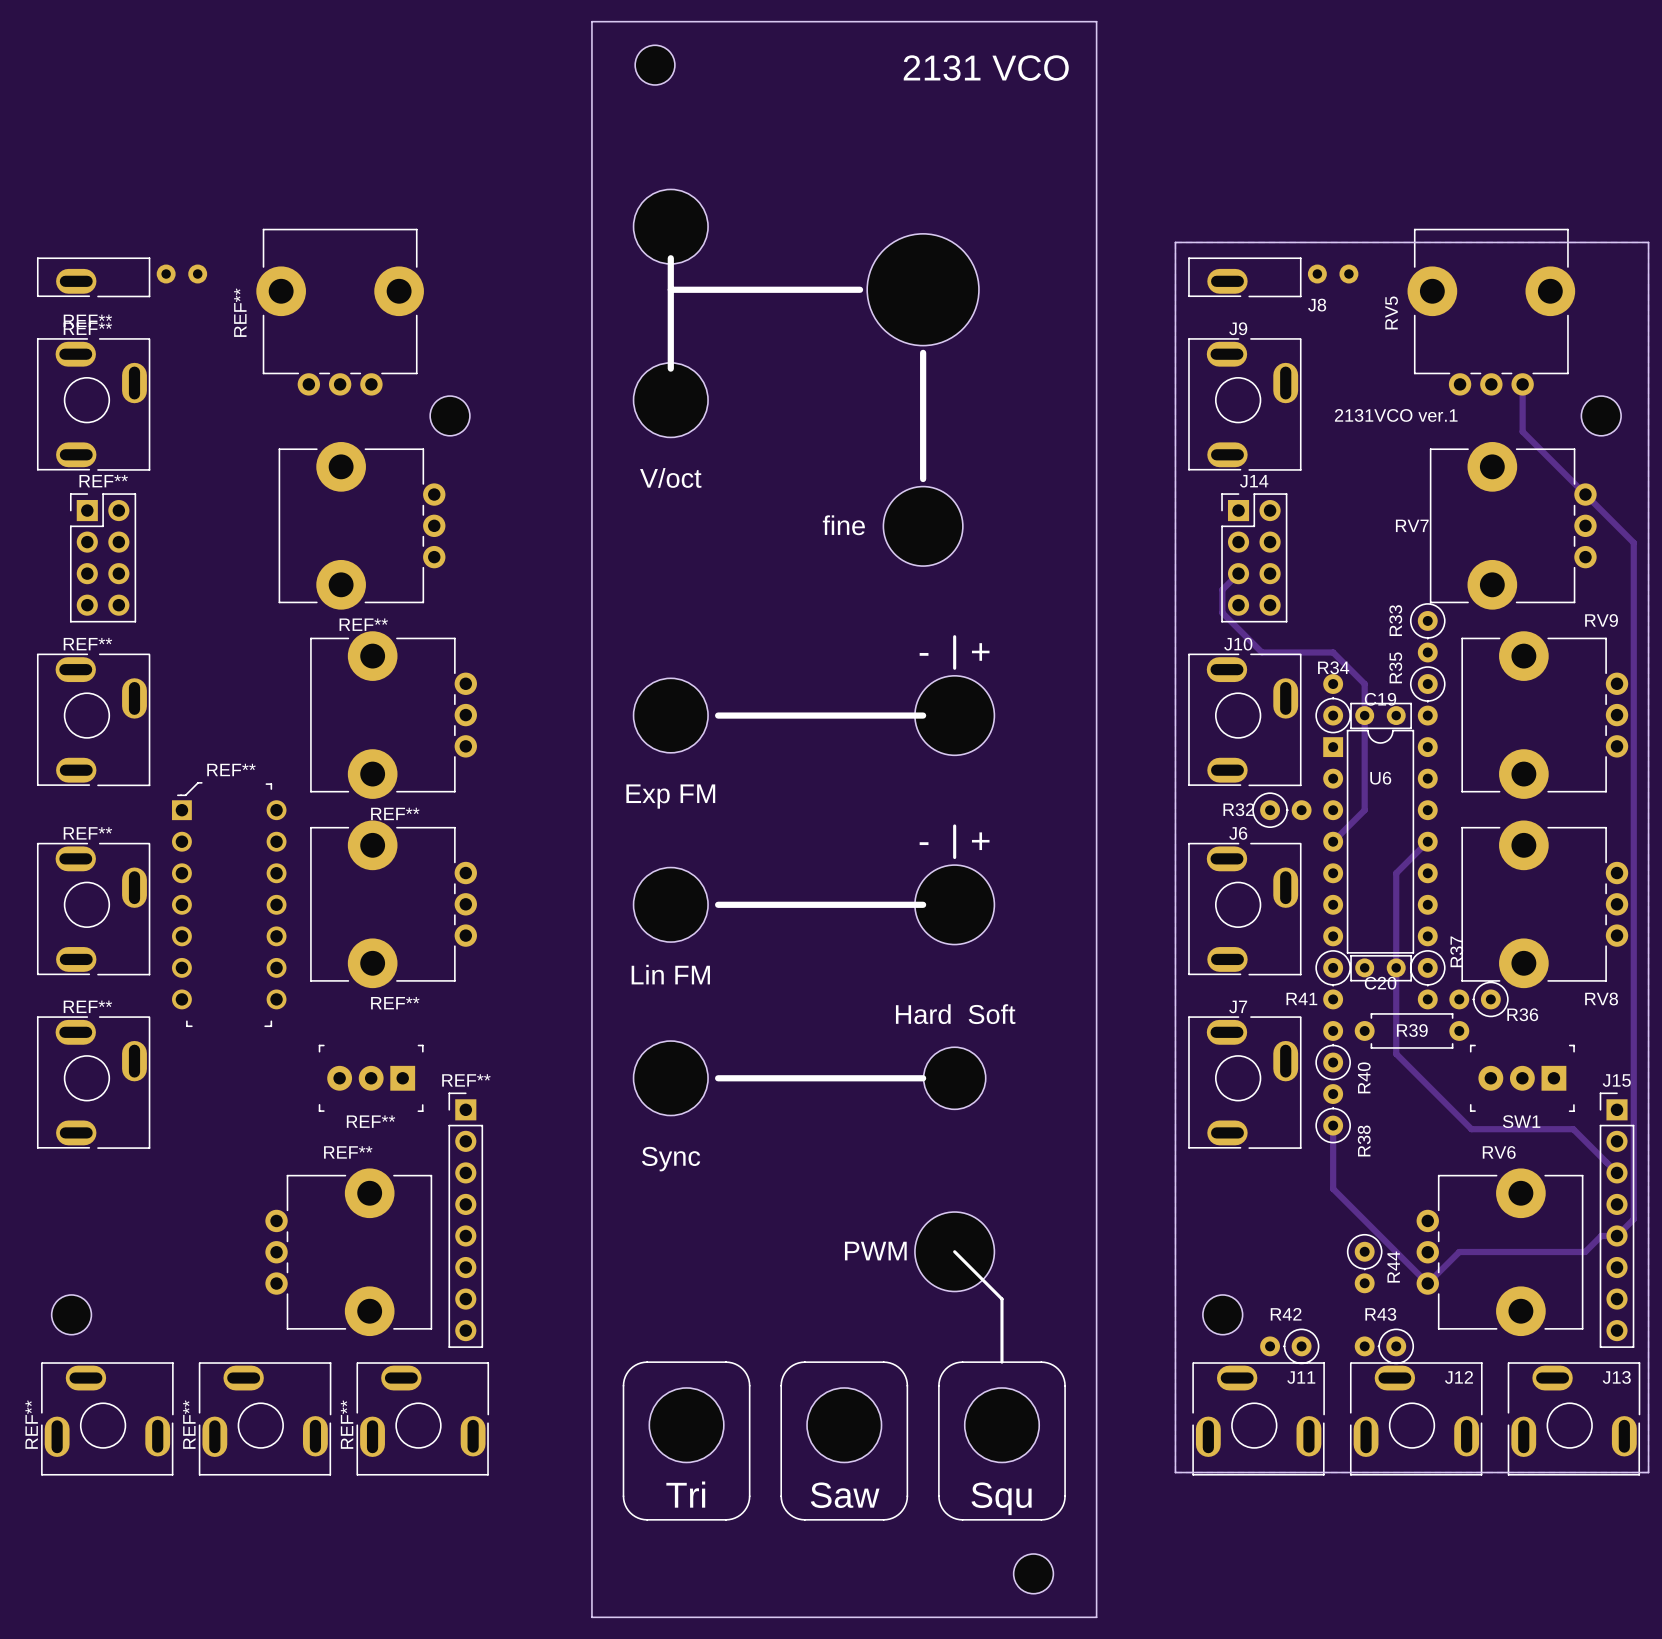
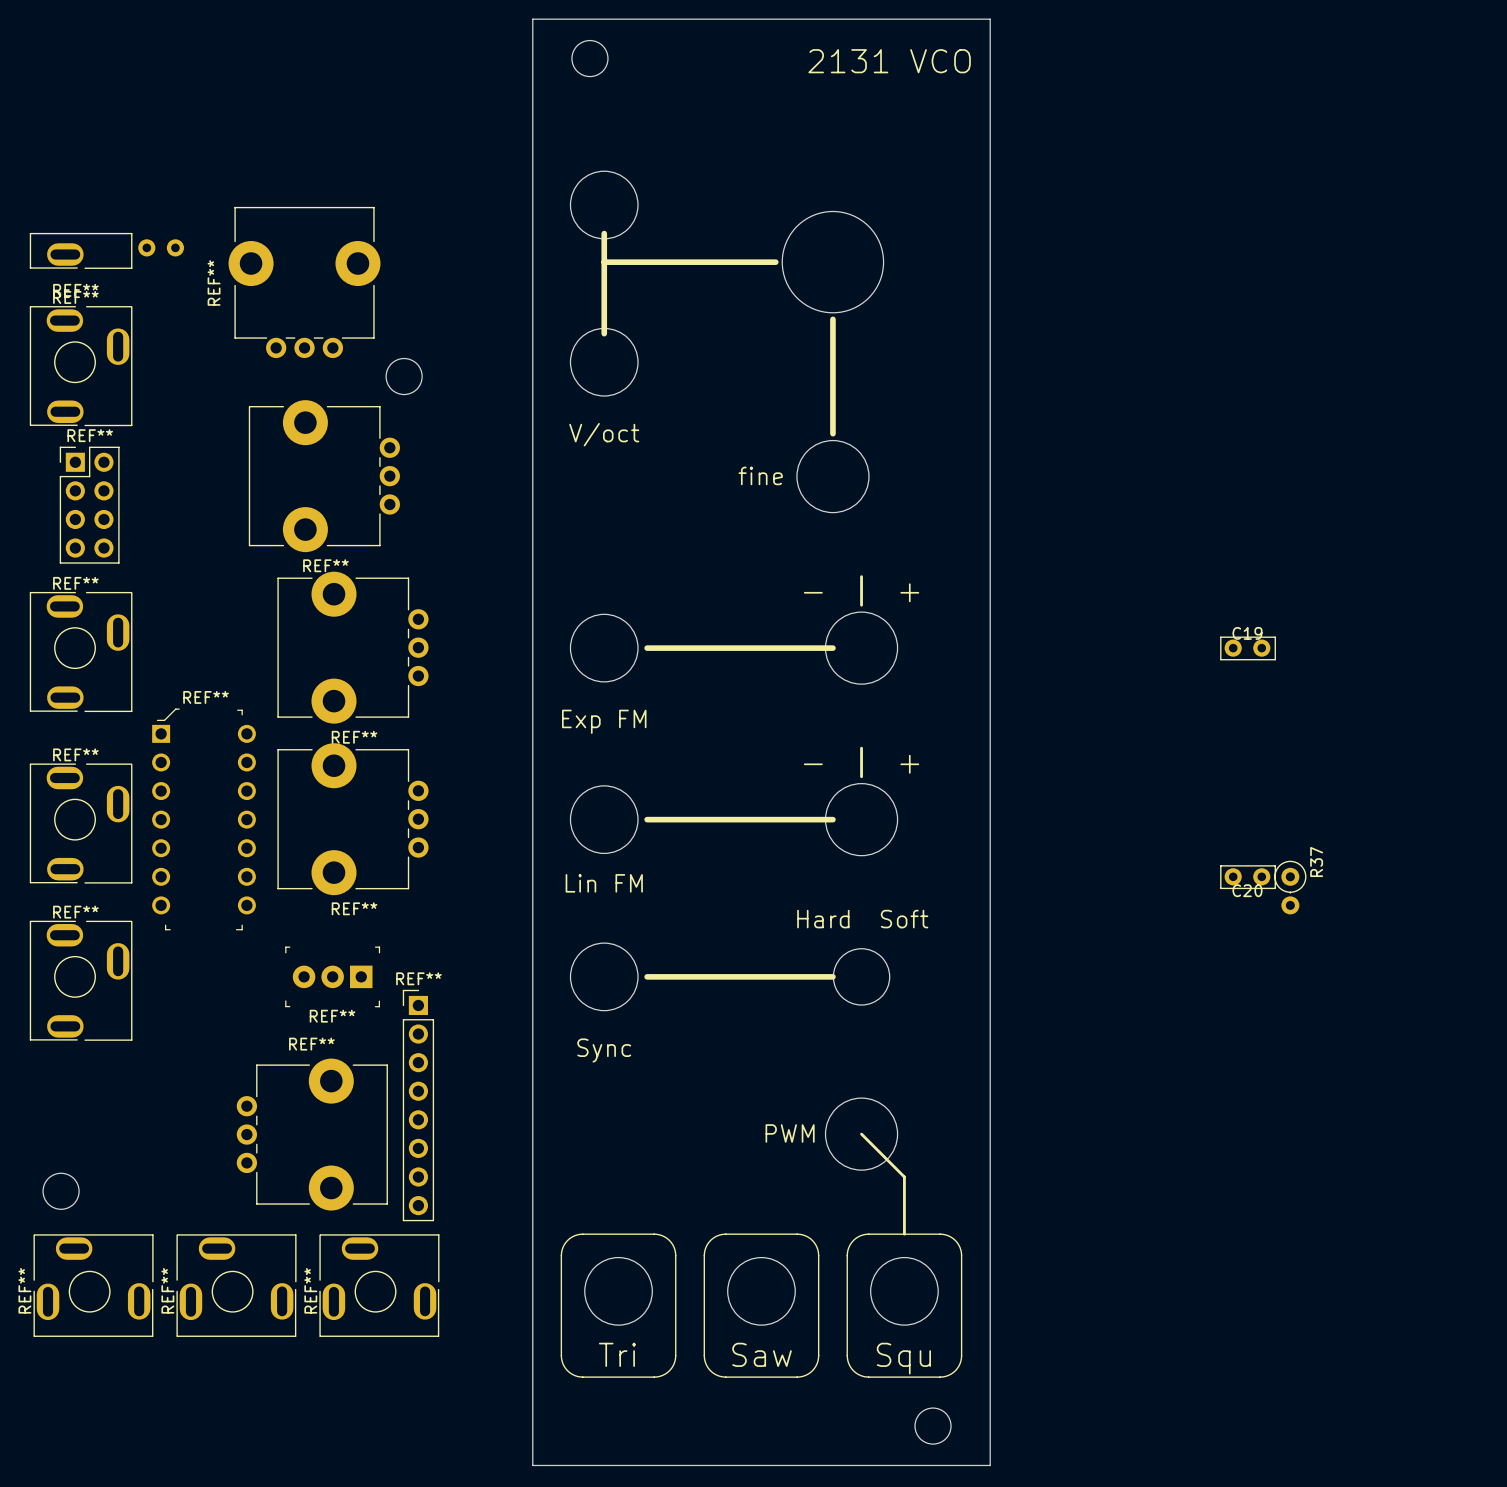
board edge: (1175, 242) (1648, 242) (1648, 1472) (1175, 1472) (1175, 242) -> none
J8: (1273, 277) -> none
RV5: (1491, 312) -> none
track: (1522, 384) (1522, 431) (1633, 542) (1633, 1219) (1617, 1235) (1601, 1235) (1585, 1252) (1459, 1252) (1427, 1283) (1333, 1188) (1333, 1125) -> none
J9: (1244, 404) -> none
text: 2131VCO ver.1 (1396, 415) -> none
part: (1601, 415) -> none
RV7: (1513, 525) -> none
J14: (1254, 557) -> none
track: (1238, 573) (1222, 589) (1222, 612) (1261, 652) (1333, 652) (1364, 684) (1364, 810) (1333, 841) -> none
R33: (1427, 632) -> none
R35: (1427, 695) -> none
R34: (1333, 703) -> none
RV9: (1544, 715) -> none
J10: (1244, 719) -> none
R32: (1281, 810) -> none
U6: (1380, 841) -> none
track: (1427, 841) (1396, 873) (1396, 1053) (1471, 1129) (1573, 1129) (1617, 1172) -> none
RV8: (1544, 904) -> none
J6: (1244, 909) -> none
R41: (1333, 979) -> none
R36: (1478, 999) -> none
R39: (1412, 1030) -> none
R40: (1333, 1050) -> none
SW1: (1522, 1078) -> none
J7: (1244, 1082) -> none
R38: (1333, 1113) -> none
J15: (1617, 1220) -> none
RV6: (1499, 1252) -> none
R44: (1364, 1263) -> none
part: (1222, 1314) -> none
R42: (1289, 1346) -> none
R43: (1384, 1346) -> none
J11: (1258, 1418) -> none
J12: (1416, 1418) -> none
J13: (1573, 1418) -> none

